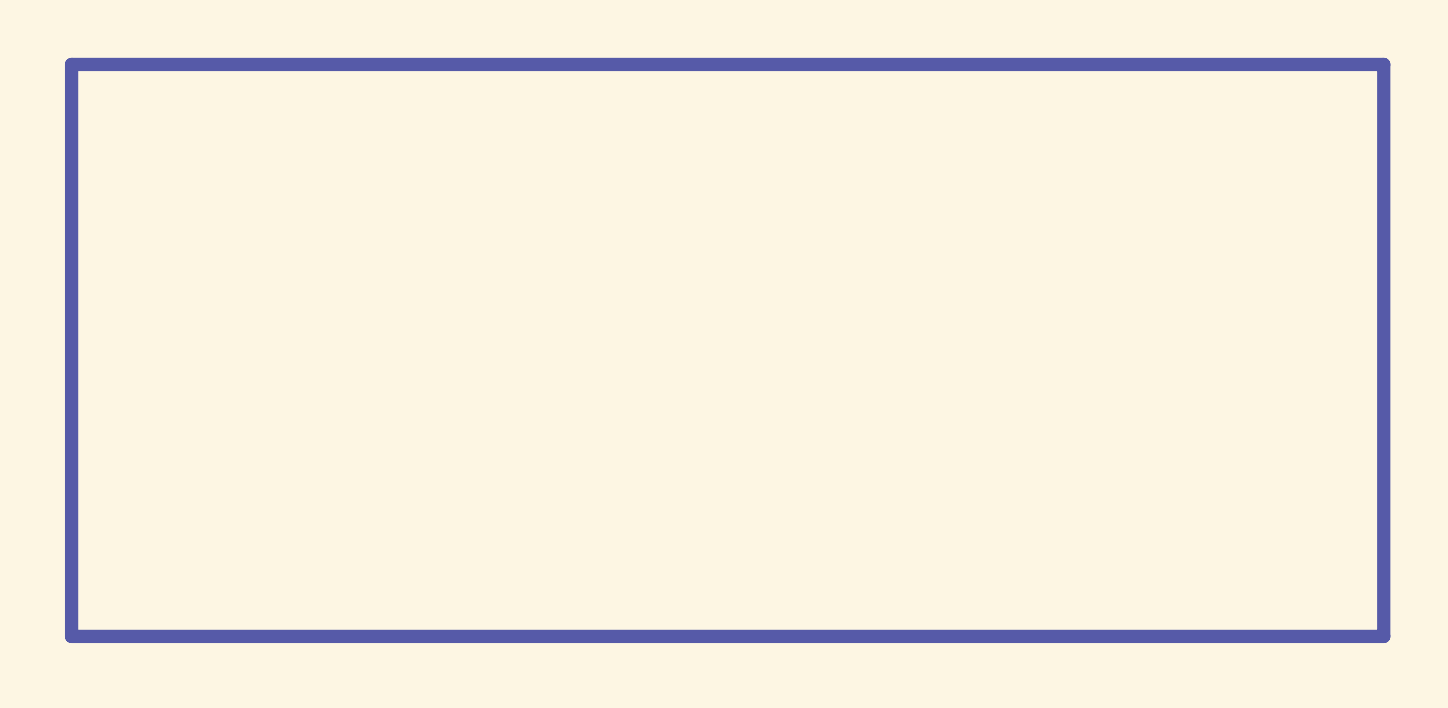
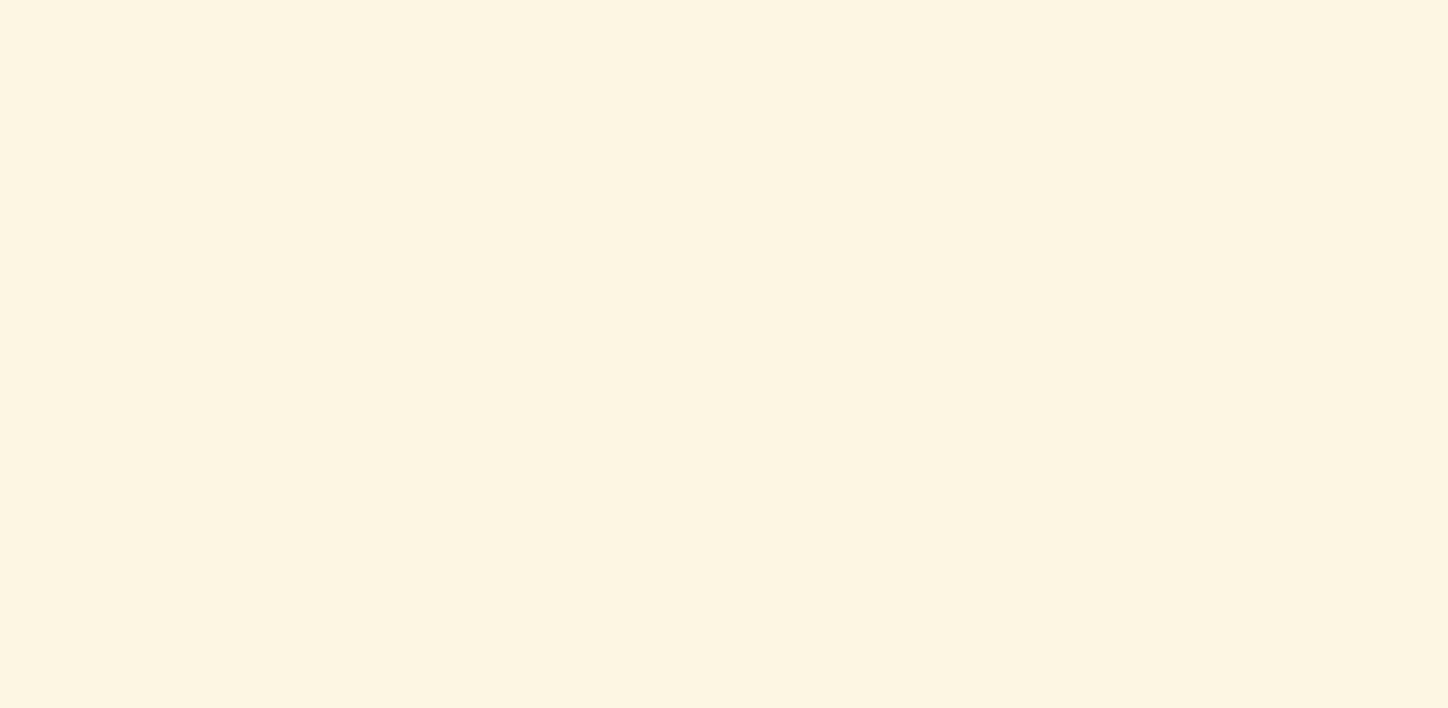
line: (71, 64) (1383, 64) (1383, 636) (71, 636) (71, 64) -> none

